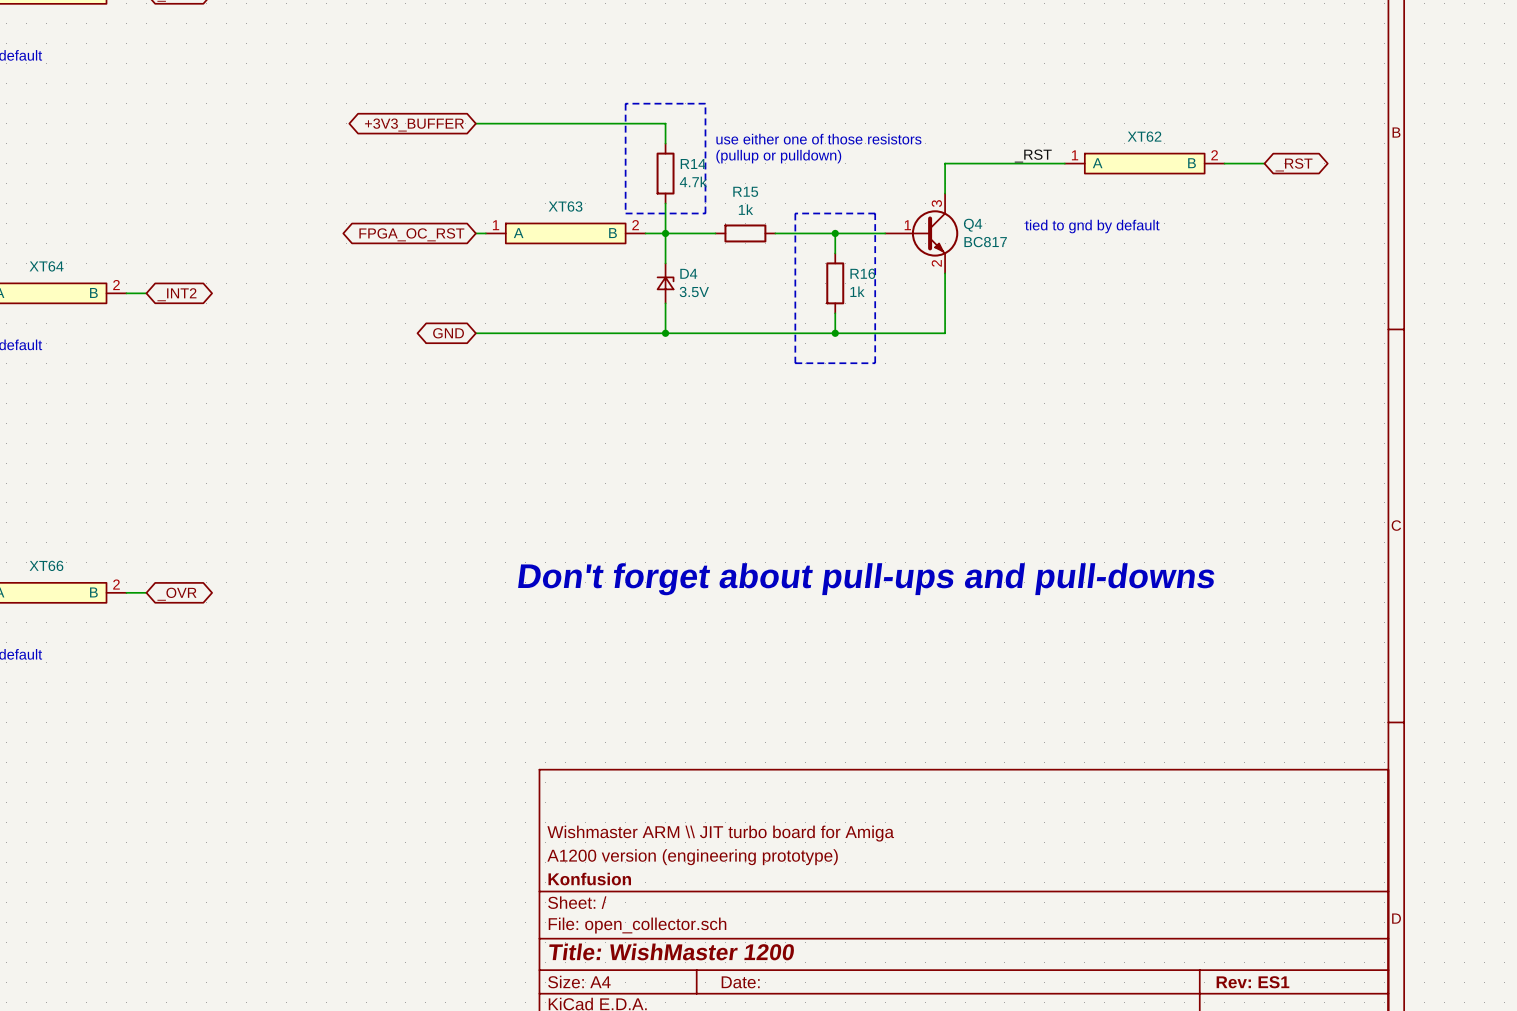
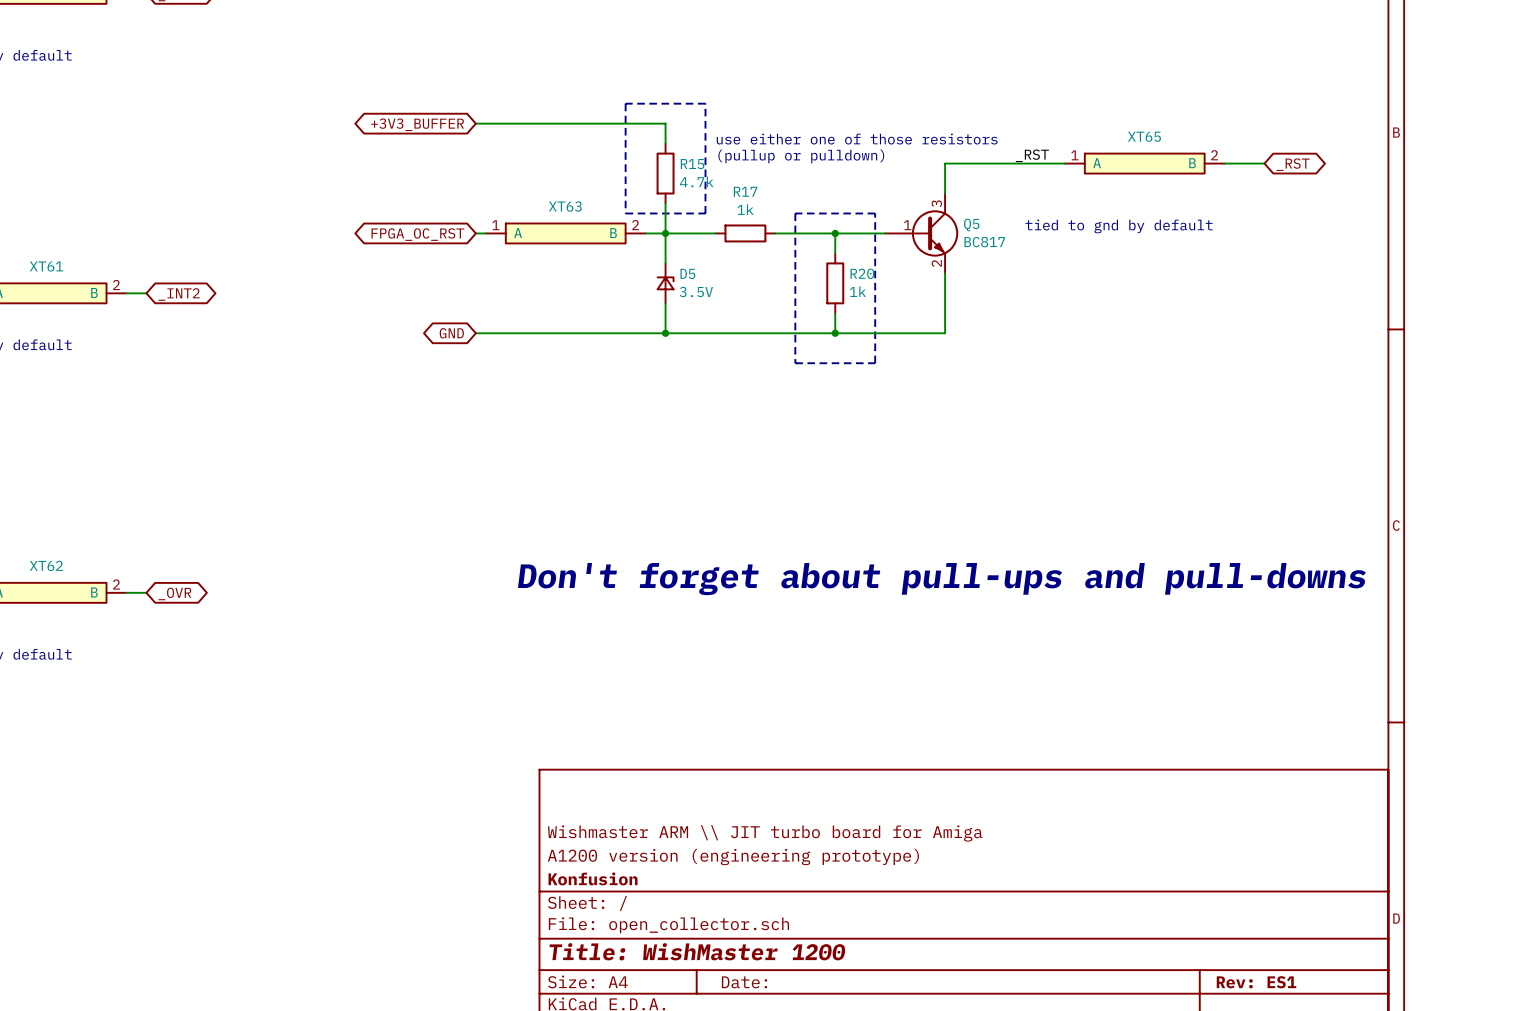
XT62 name: XT62 (1144, 136) -> XT65 (1144, 136)
R14 name: R14 (693, 164) -> R15 (692, 164)
R15 name: R15 (745, 191) -> R17 (745, 191)
Q4 name: Q4 (973, 225) -> Q5 (971, 224)
XT64 name: XT64 (46, 266) -> XT61 (46, 266)
D4 name: D4 (688, 273) -> D5 (687, 273)
R16 name: R16 (862, 273) -> R20 (862, 273)
XT66 name: XT66 (46, 565) -> XT62 (46, 565)

